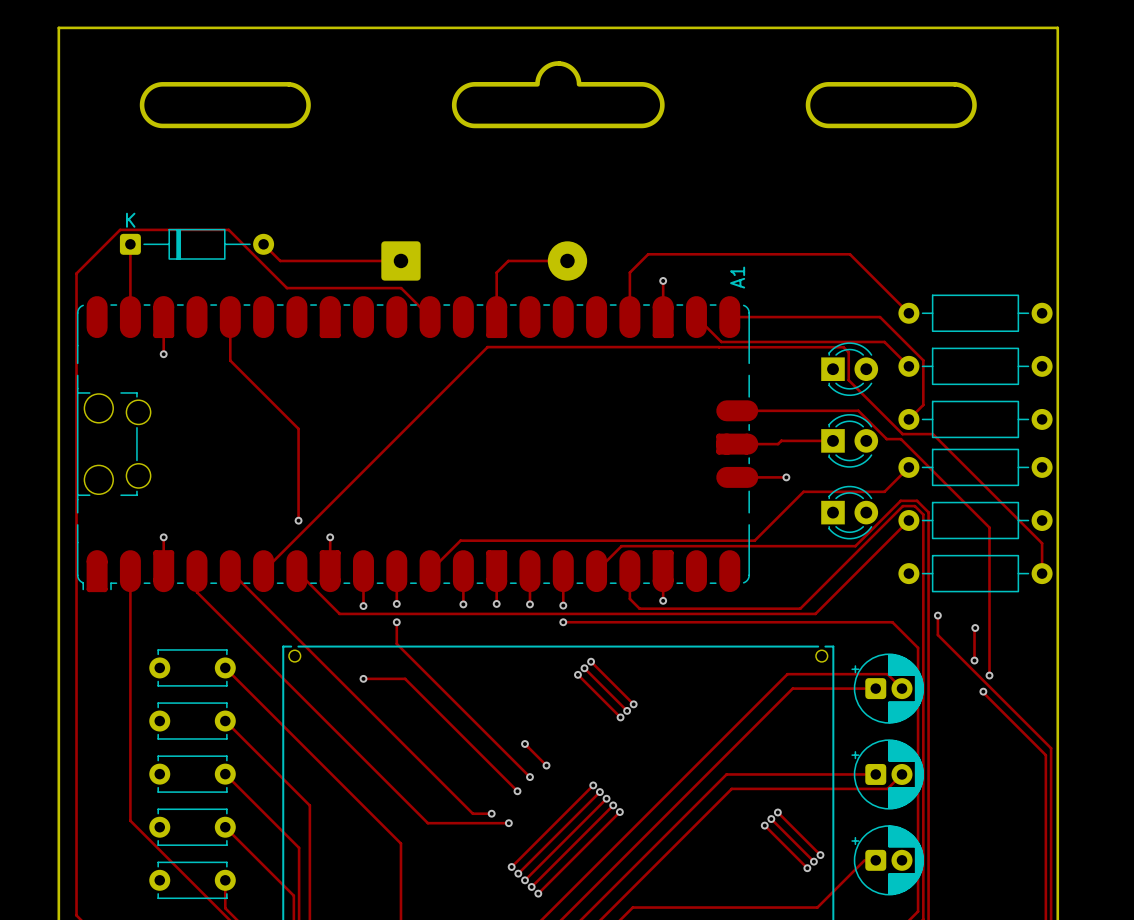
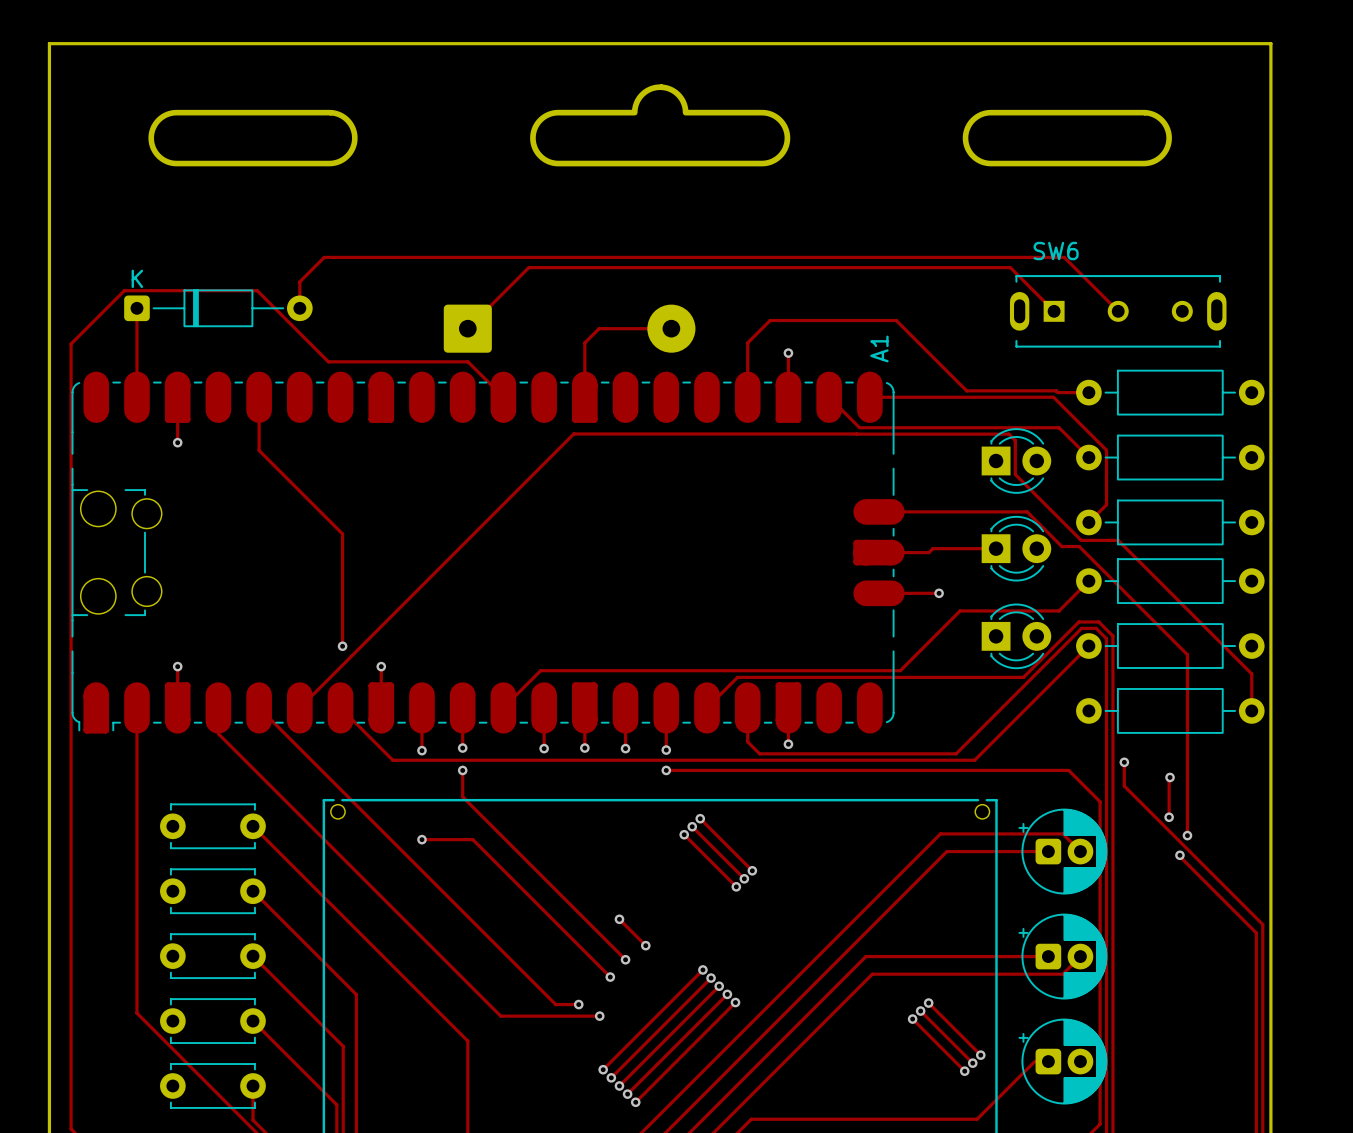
track: (263, 244) (280, 260) (400, 260) -> (299, 308) (299, 281) (324, 257) (1064, 257) (1118, 311)
track: none -> (1054, 311) (1010, 267) (528, 267) (467, 328)
SW6: none -> (1118, 311)
track: (751, 254) (849, 254) (908, 313) -> (896, 320) (966, 390) (1088, 392)

